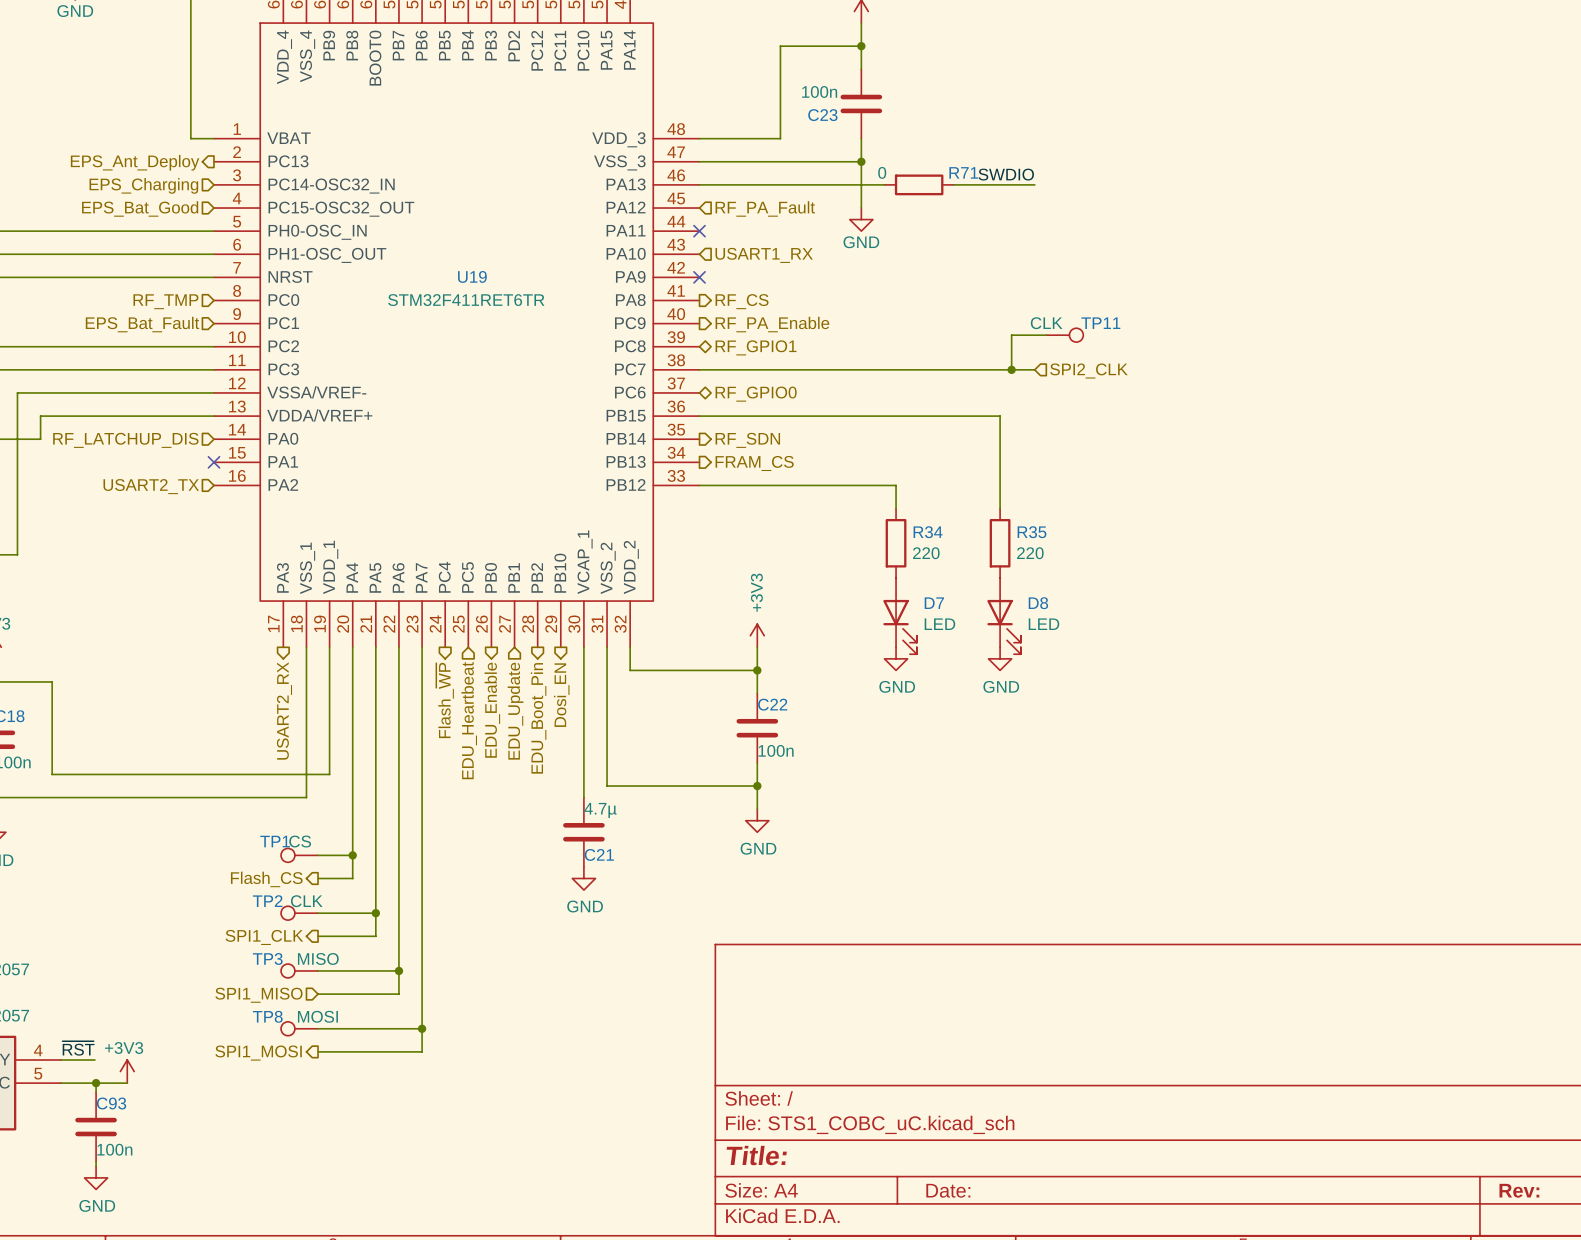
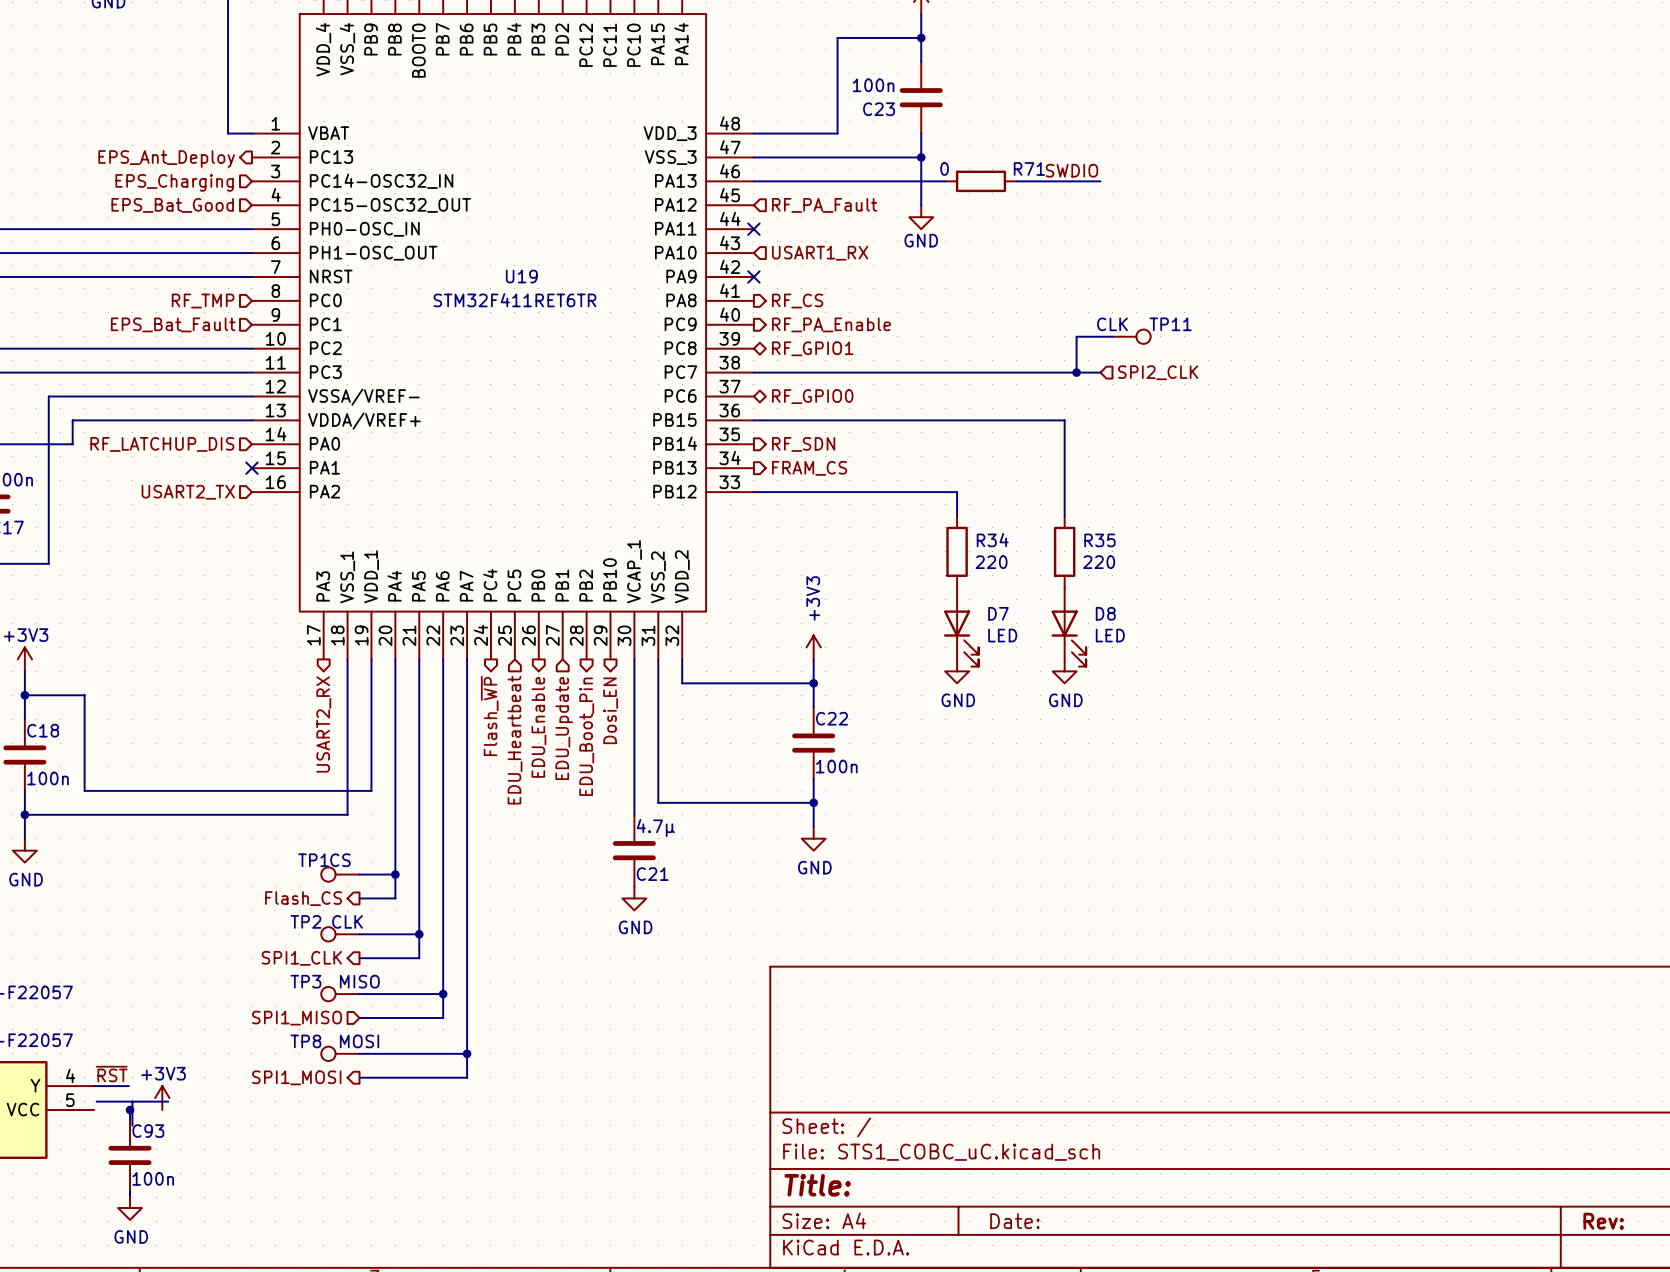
wire: none -> (96, 1101) (168, 1101)
wire: none -> (132, 1101) (132, 1125)
wire: (61, 1083) (127, 1083) -> none

